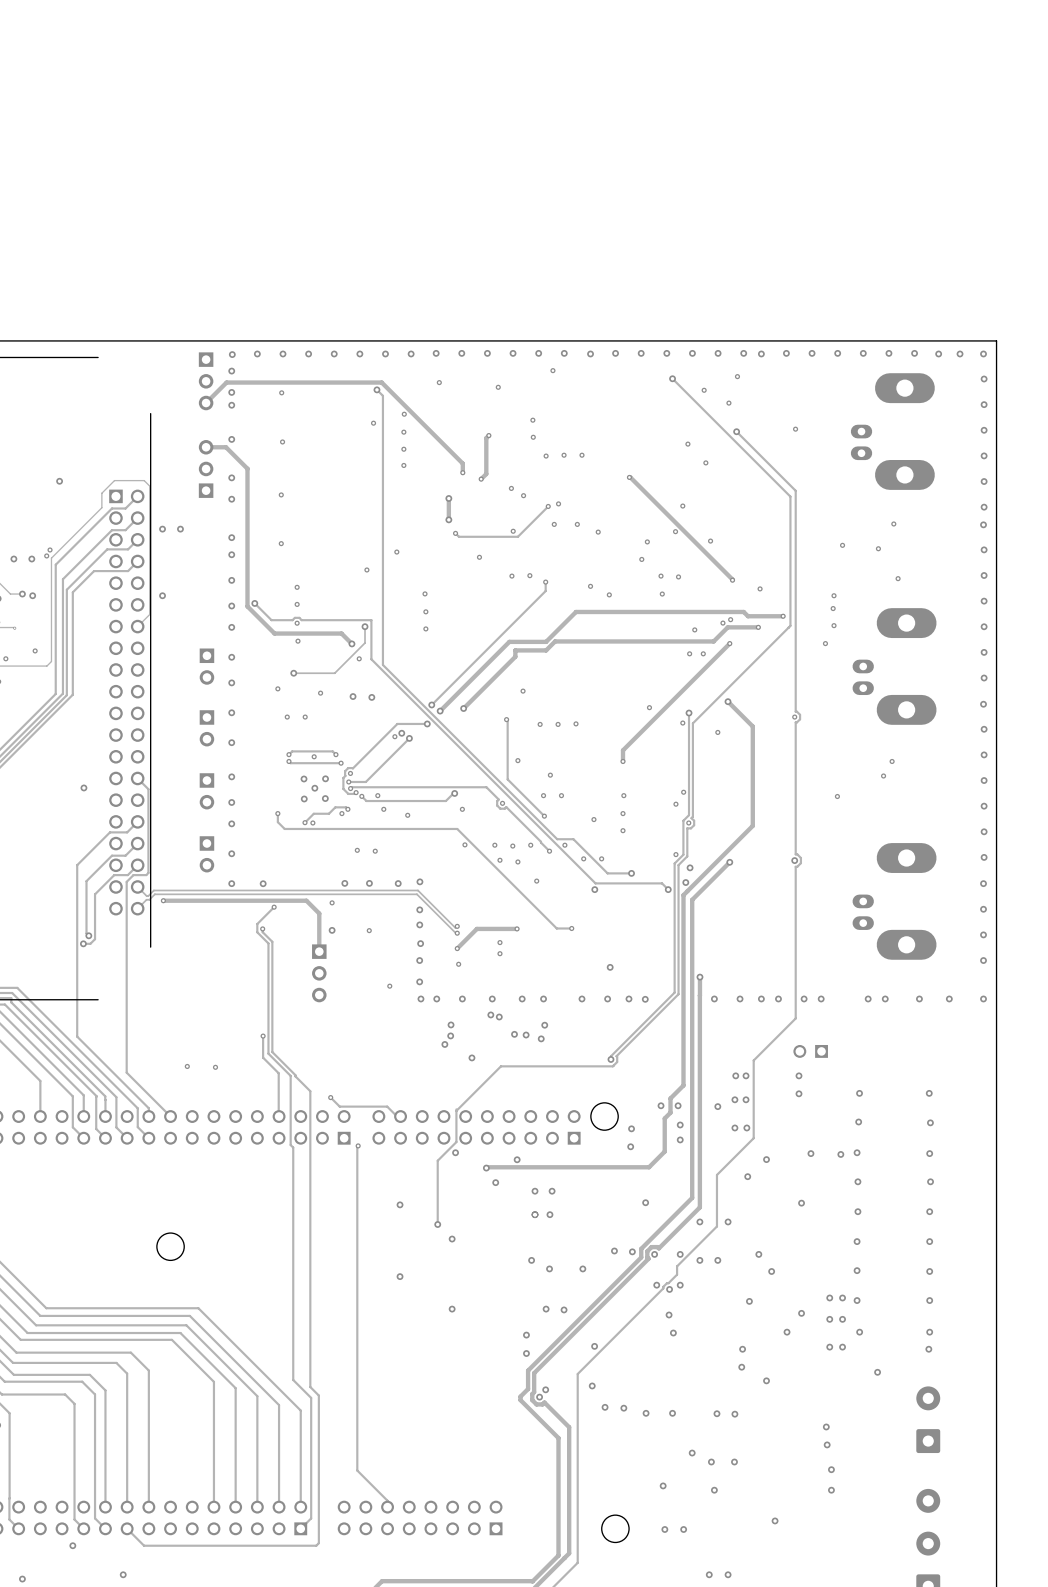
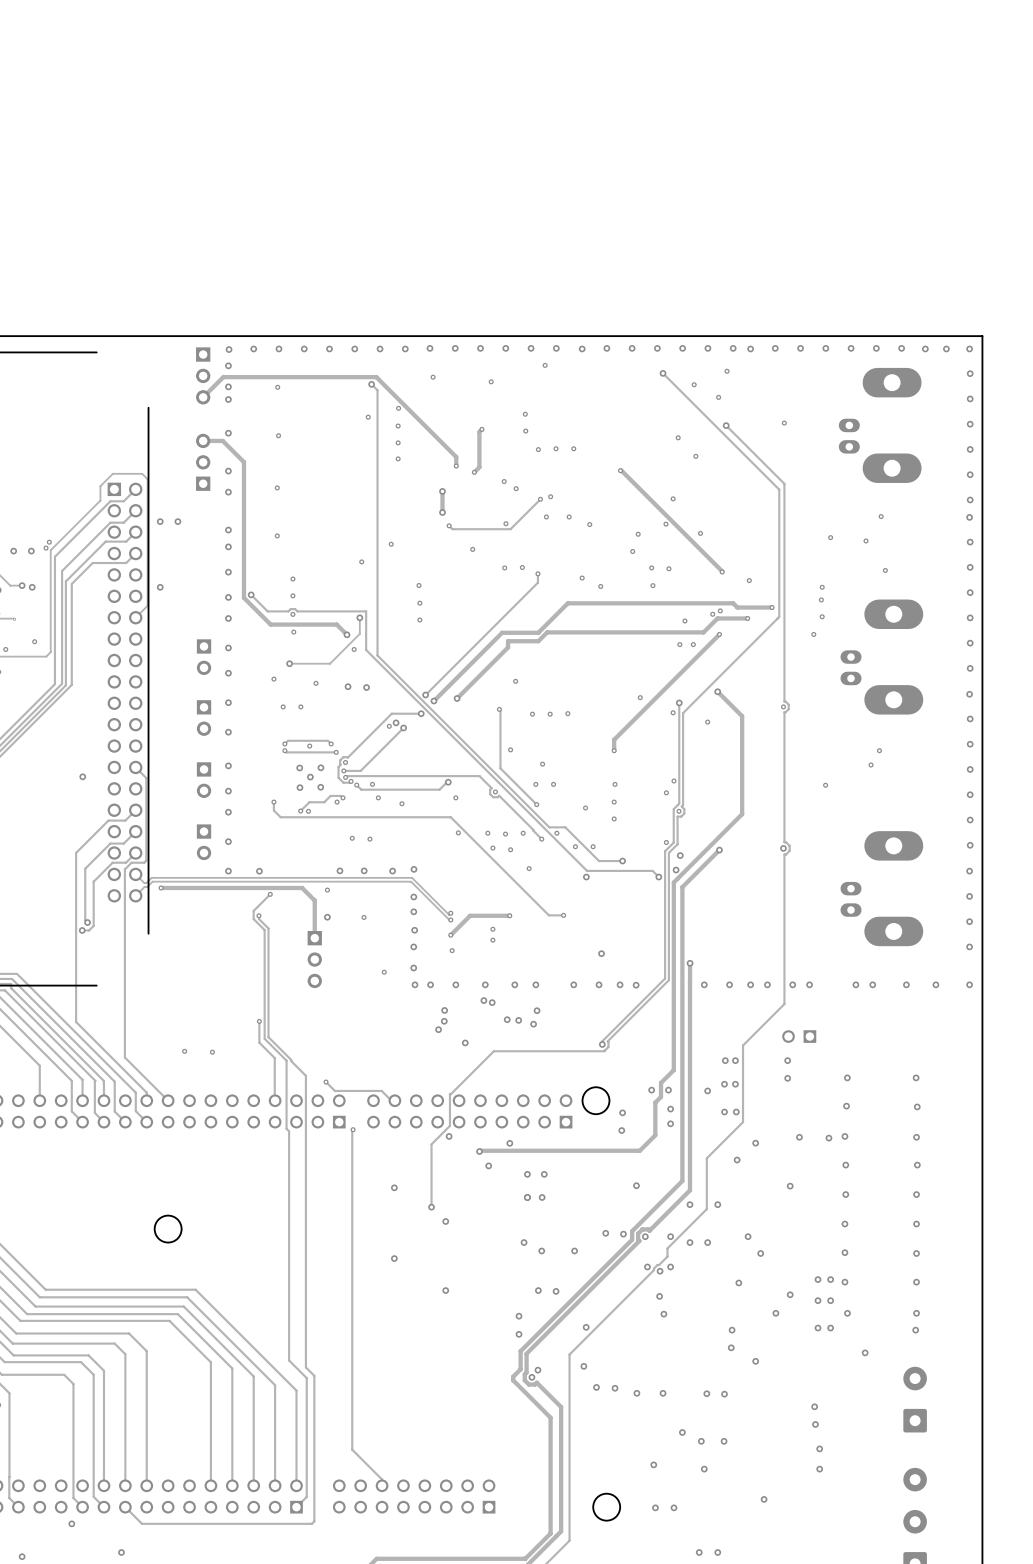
via: (59, 481) -> none

